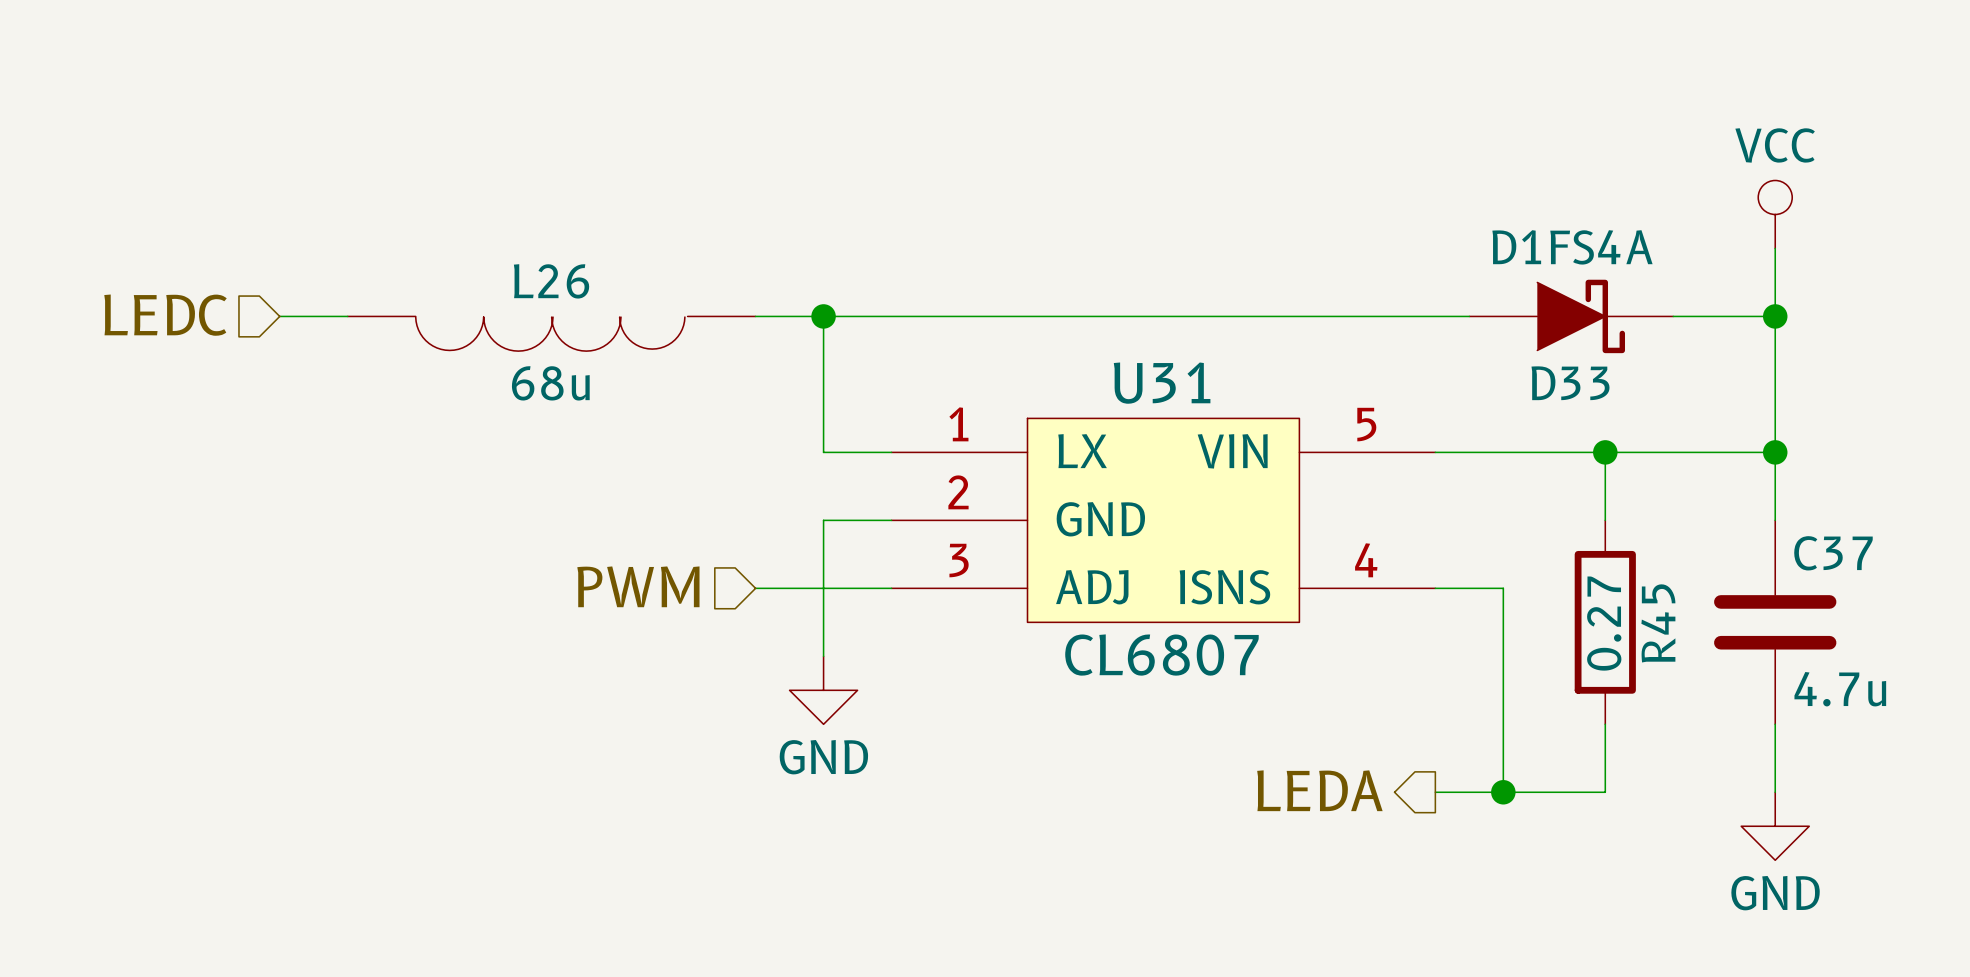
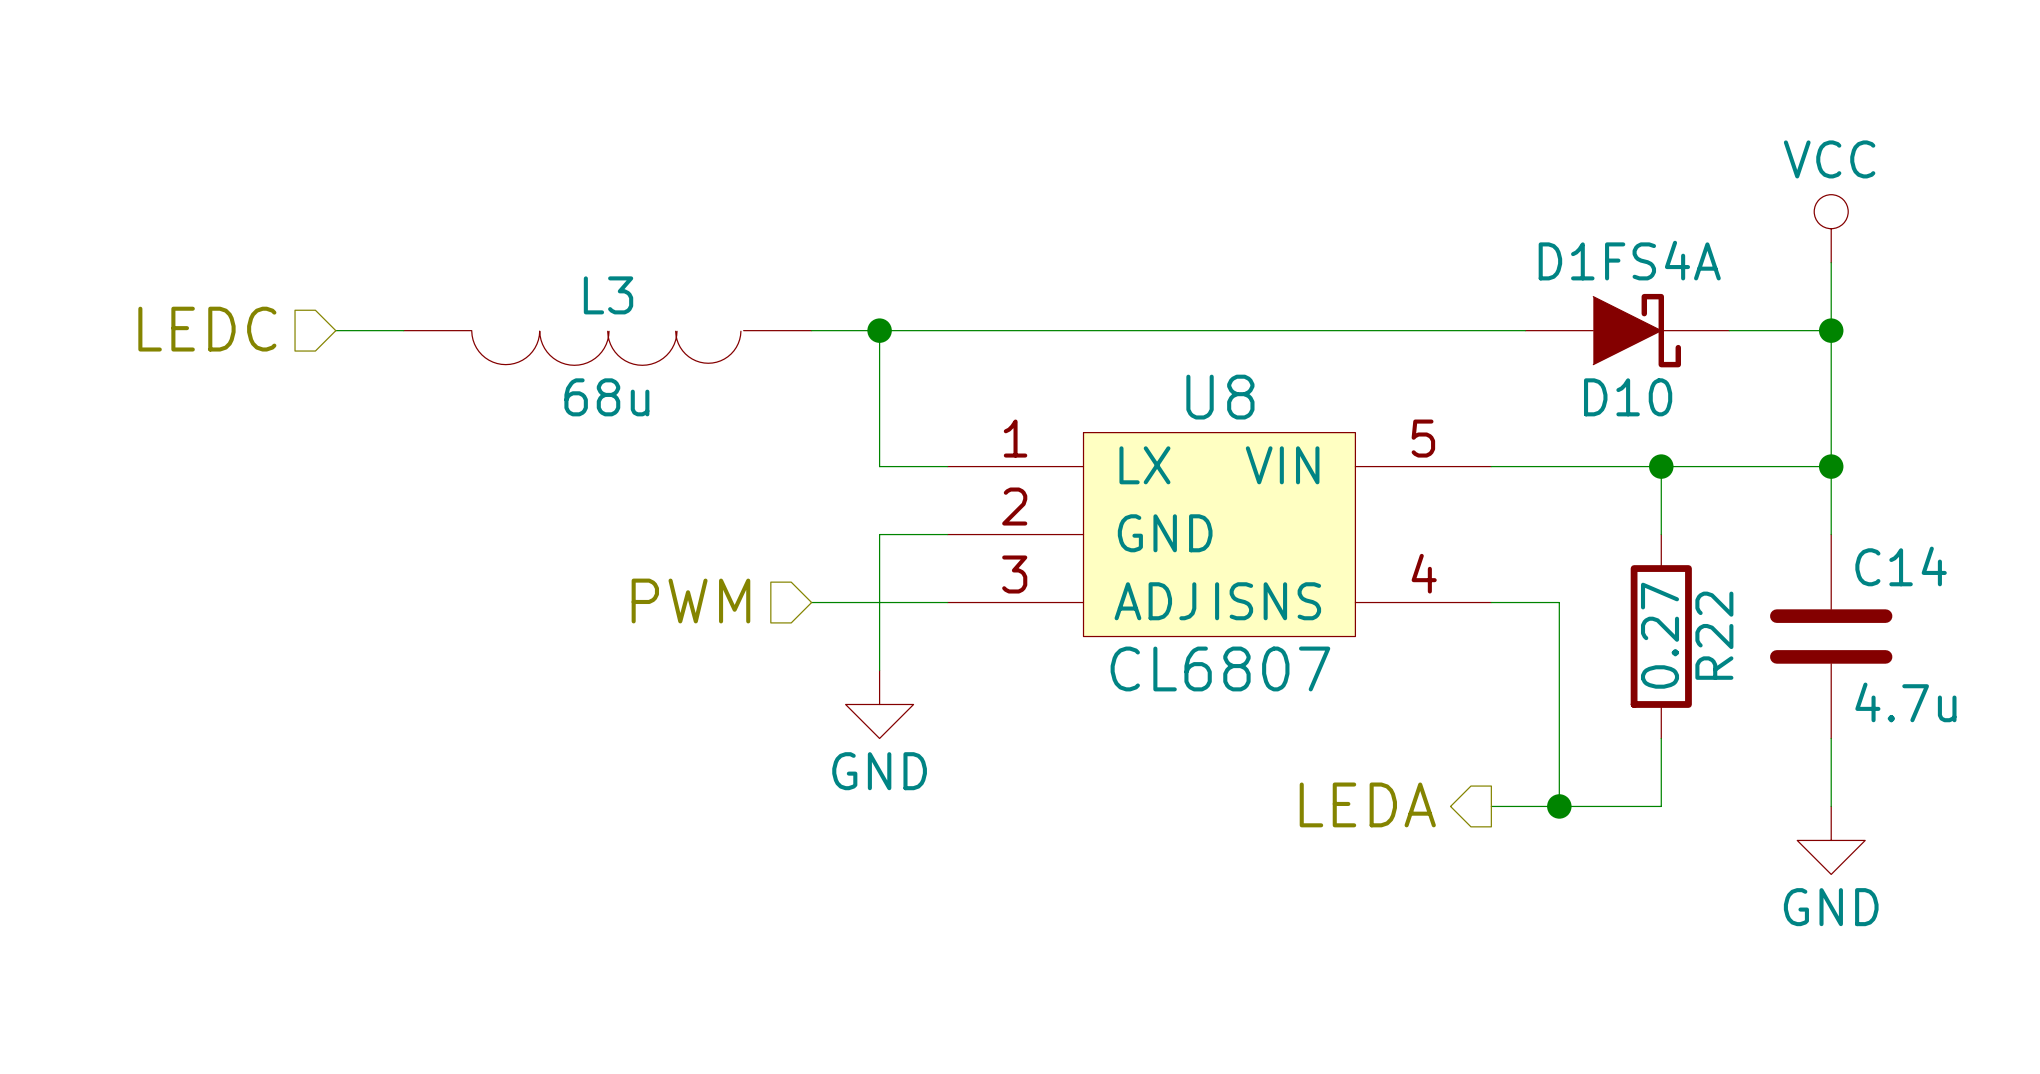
L26 name: L26 (551, 281) -> L3 (608, 295)
U31 name: U31 (1162, 383) -> U8 (1220, 397)
D33 name: D33 (1570, 383) -> D10 (1628, 397)
C37 name: C37 (1833, 553) -> C14 (1901, 566)
R45 name: R45 (1658, 623) -> R22 (1714, 635)

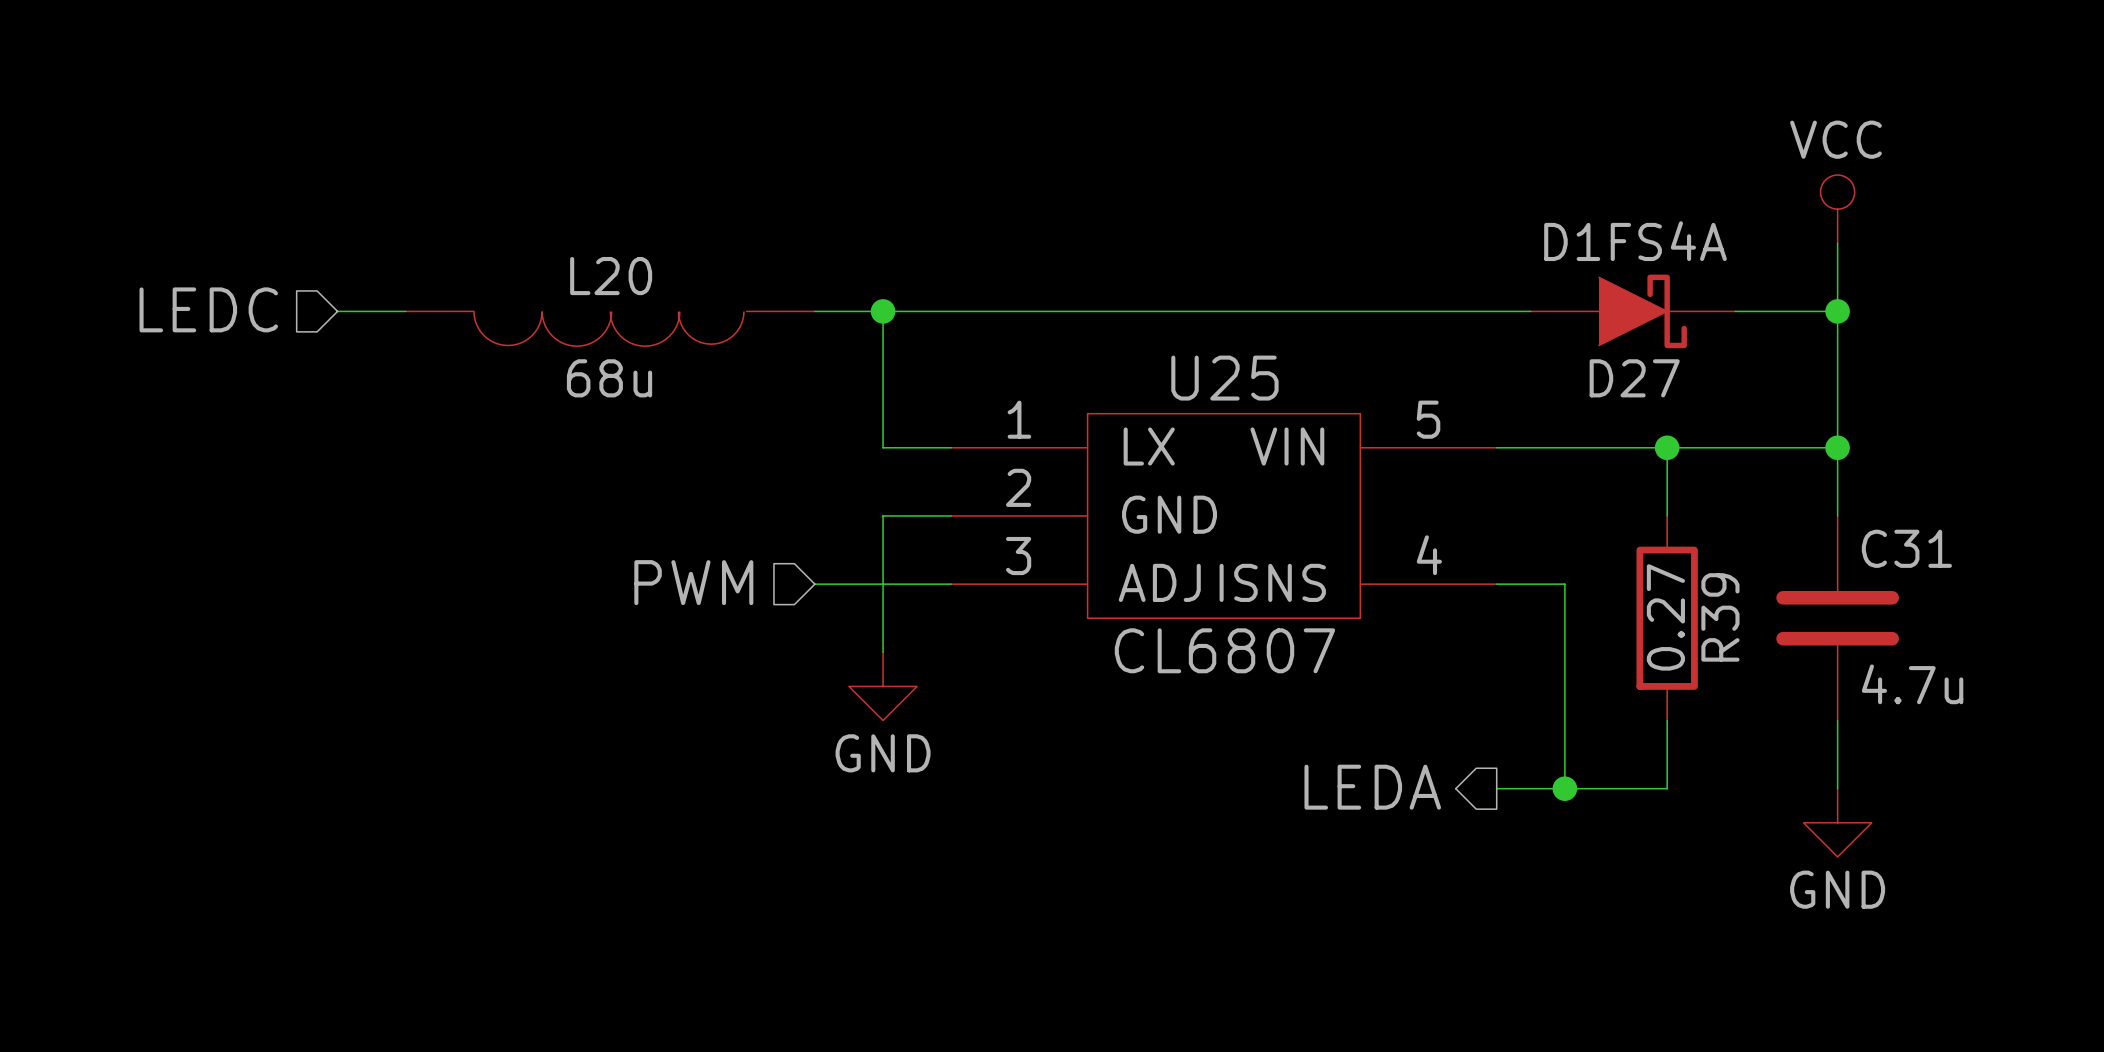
L3 name: L3 (608, 295) -> L20 (611, 276)
U8 name: U8 (1220, 397) -> U25 (1224, 378)
D10 name: D10 (1628, 397) -> D27 (1634, 378)
C14 name: C14 (1901, 566) -> C31 (1906, 548)
R22 name: R22 (1714, 635) -> R39 (1720, 617)

